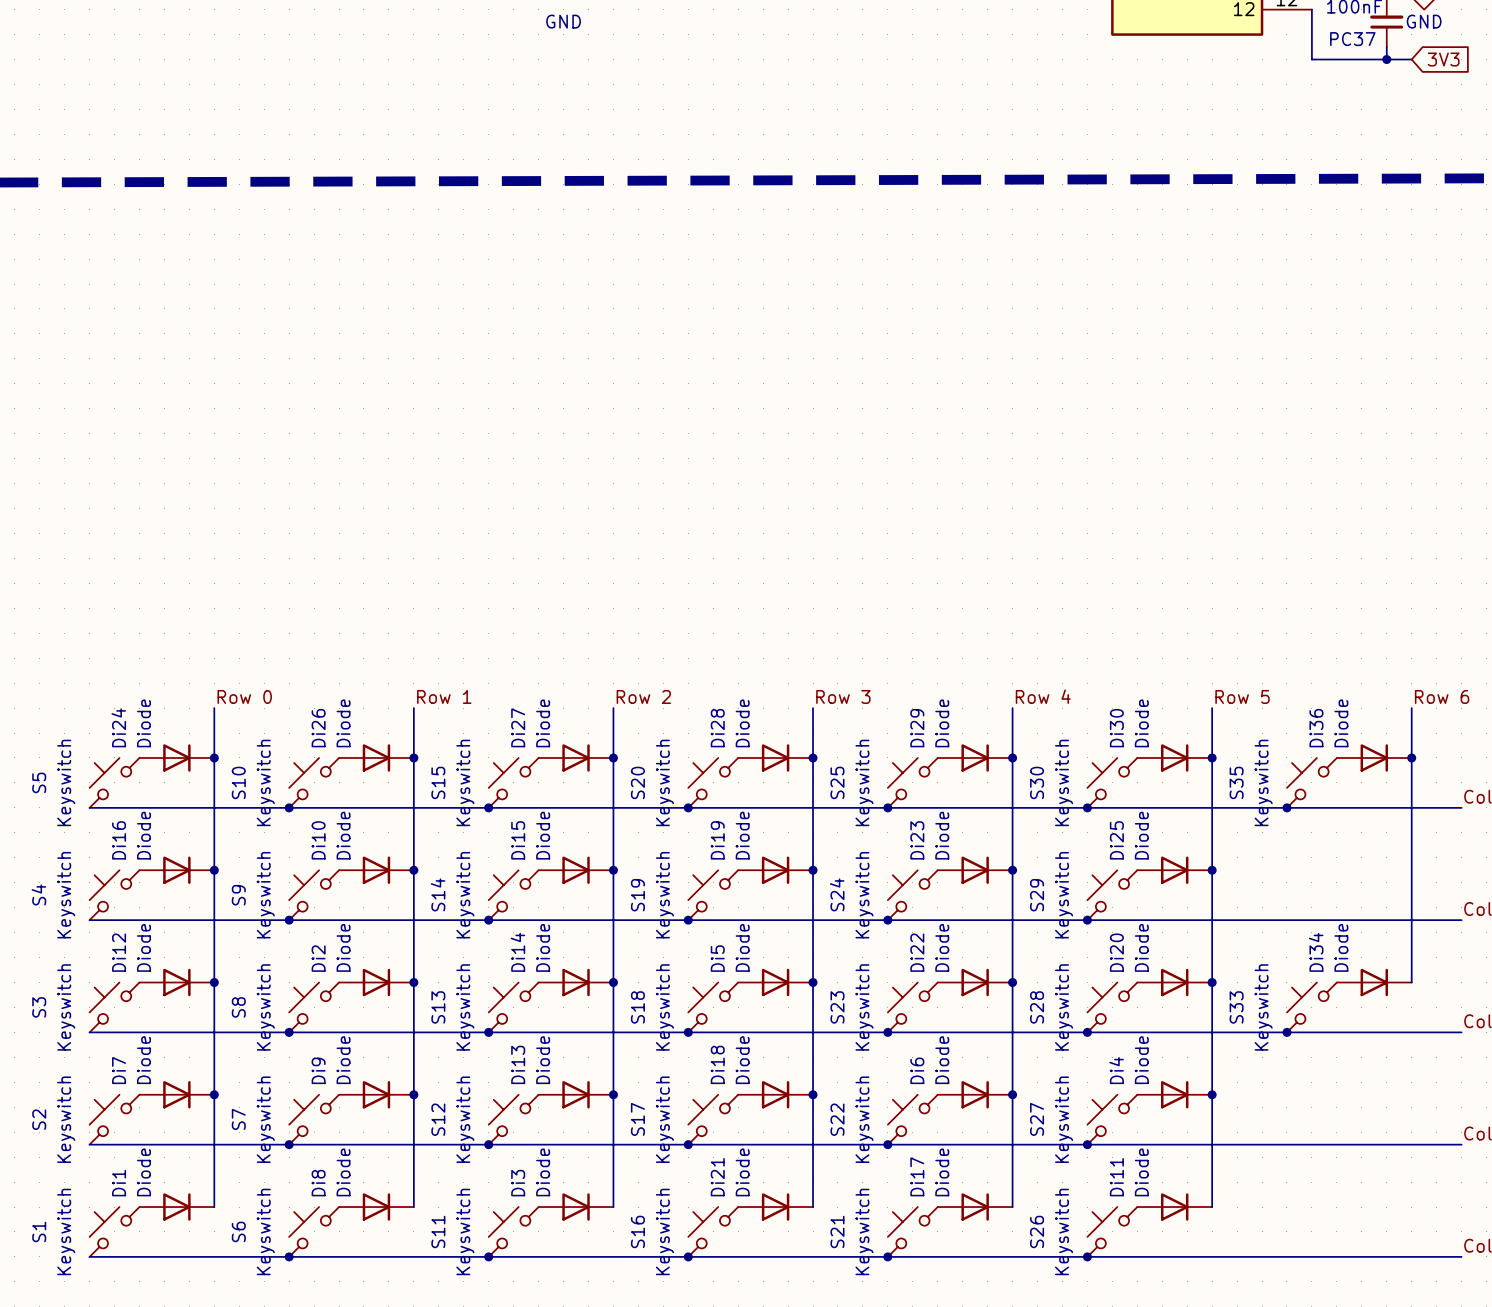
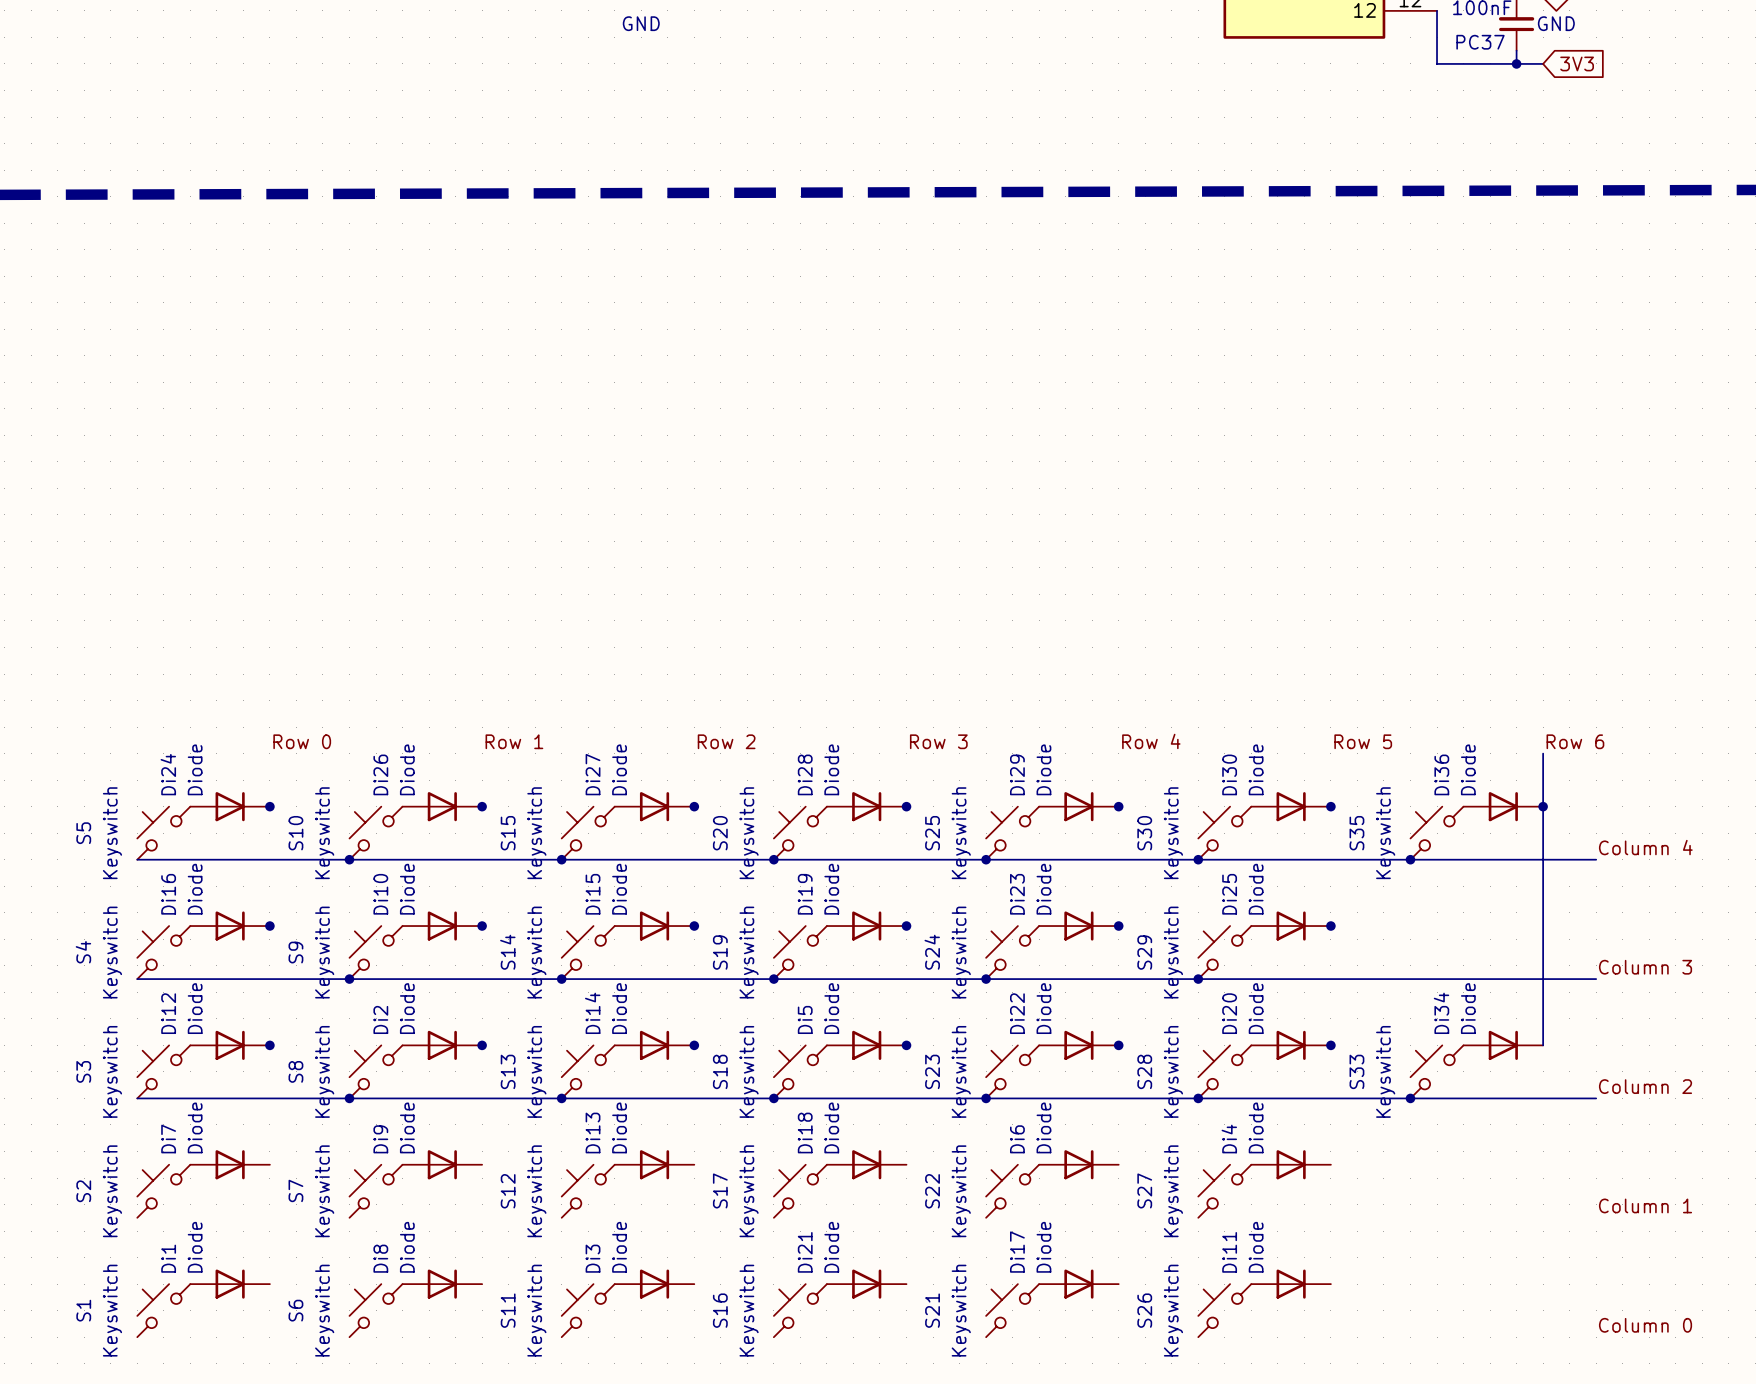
wire: (214, 708) (214, 1207) -> none
wire: (413, 708) (413, 1207) -> none
wire: (613, 708) (613, 1207) -> none
wire: (813, 708) (813, 1207) -> none
wire: (1012, 708) (1012, 1207) -> none
wire: (1212, 708) (1212, 1207) -> none
junction: (214, 1094) -> none
junction: (413, 1094) -> none
junction: (613, 1094) -> none
junction: (813, 1094) -> none
junction: (1012, 1094) -> none
junction: (1212, 1094) -> none
wire: (89, 1144) (1461, 1144) -> none
junction: (289, 1144) -> none
junction: (488, 1144) -> none
junction: (688, 1144) -> none
junction: (887, 1144) -> none
junction: (1087, 1144) -> none
wire: (89, 1256) (1461, 1256) -> none
junction: (289, 1256) -> none
junction: (488, 1256) -> none
junction: (688, 1256) -> none
junction: (887, 1256) -> none
junction: (1087, 1256) -> none

